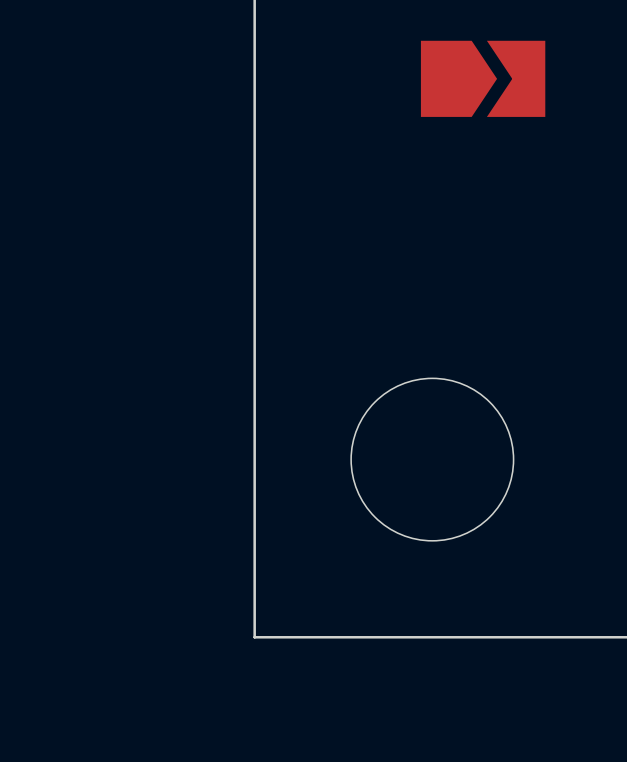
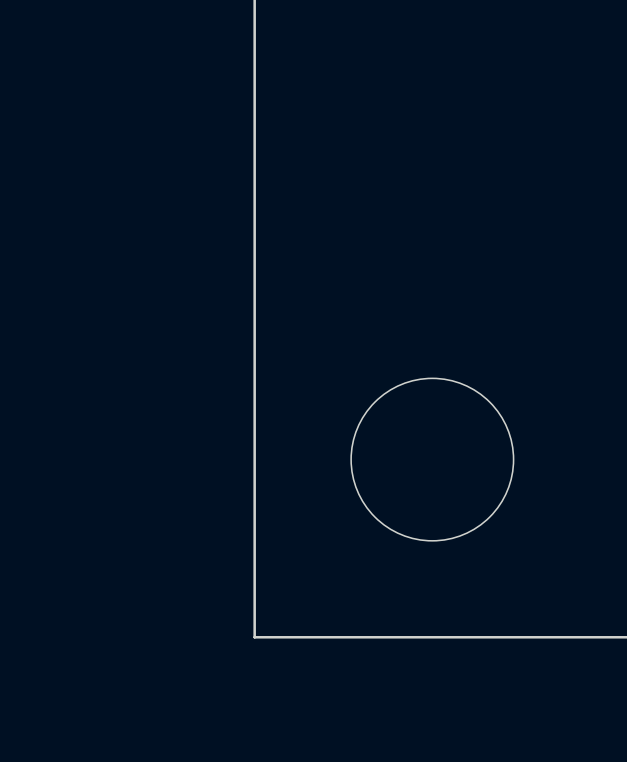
part: (483, 78) -> none

